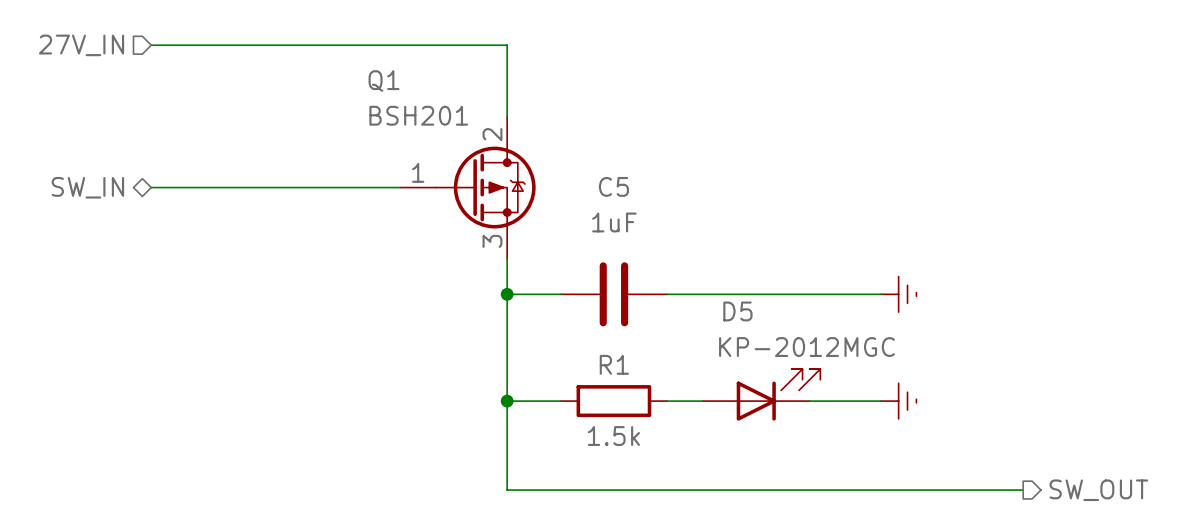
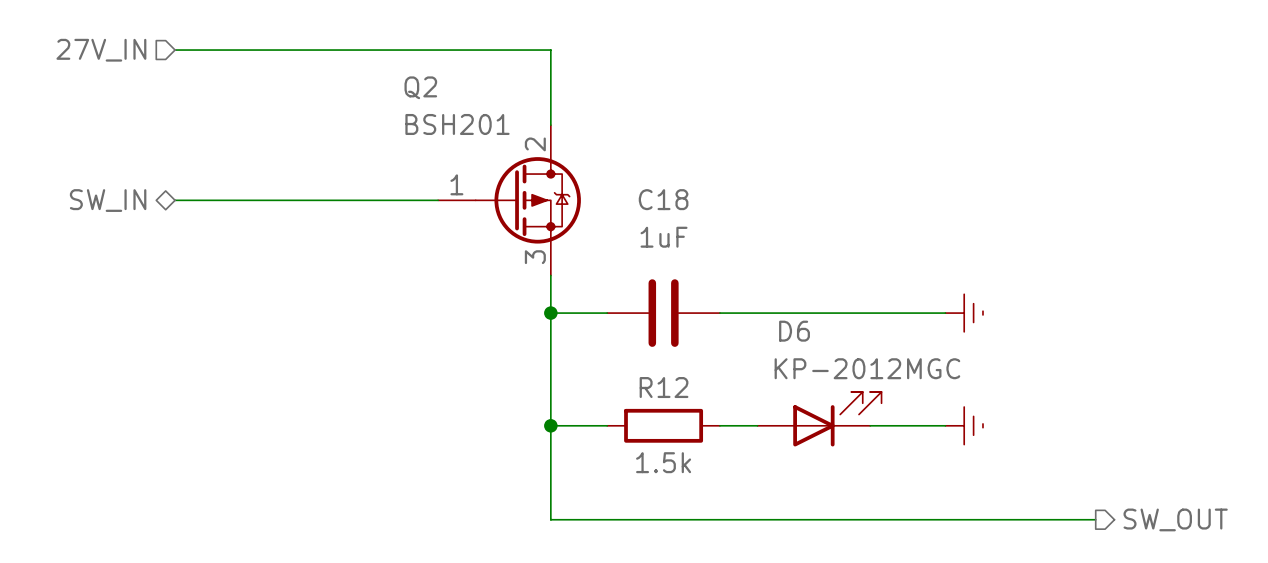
Q1 name: Q1 (384, 80) -> Q2 (420, 87)
C5 name: C5 (613, 186) -> C18 (663, 199)
D5 name: D5 (737, 311) -> D6 (794, 331)
R1 name: R1 (614, 364) -> R12 (664, 387)

